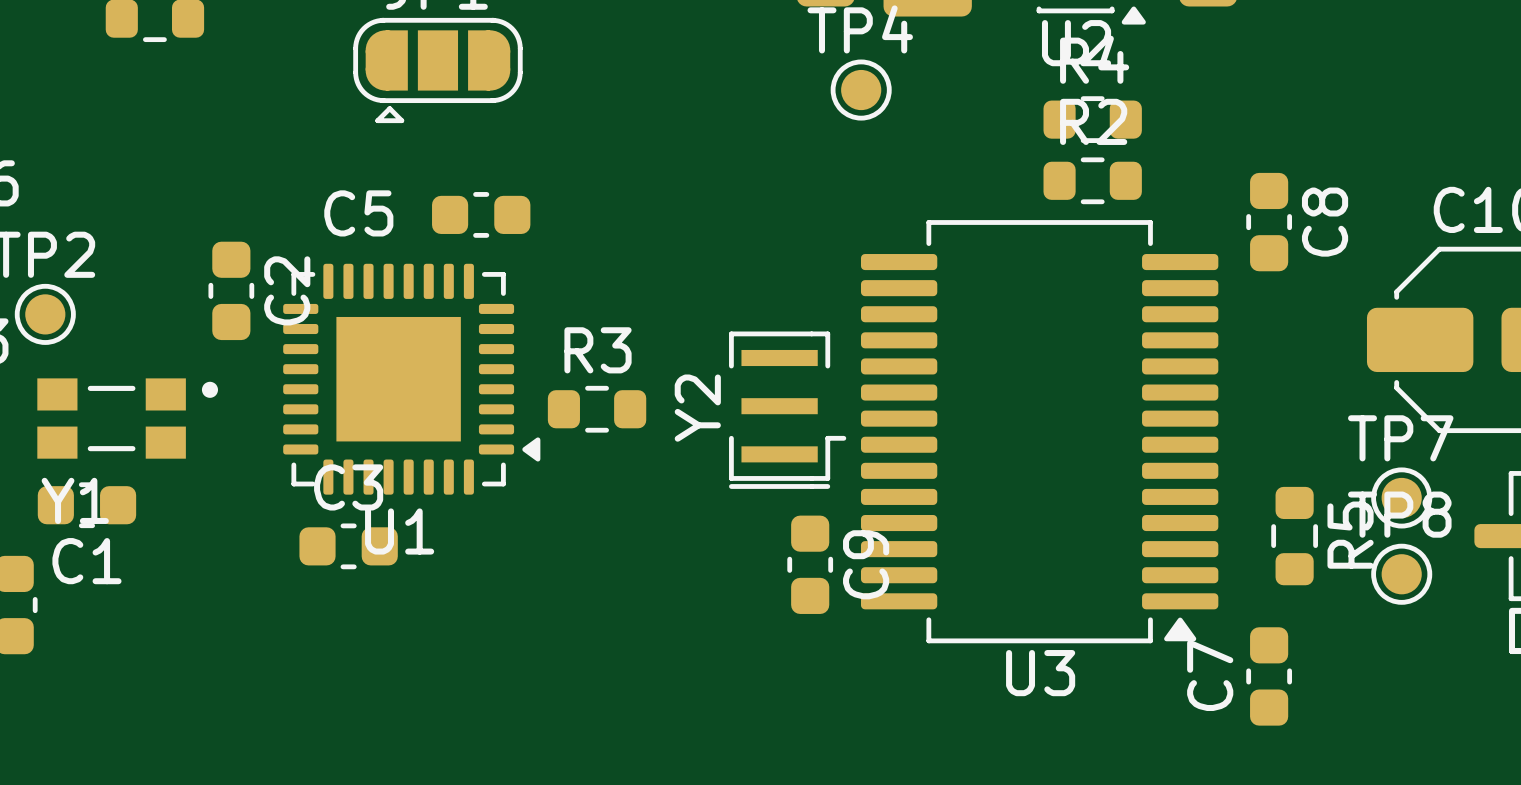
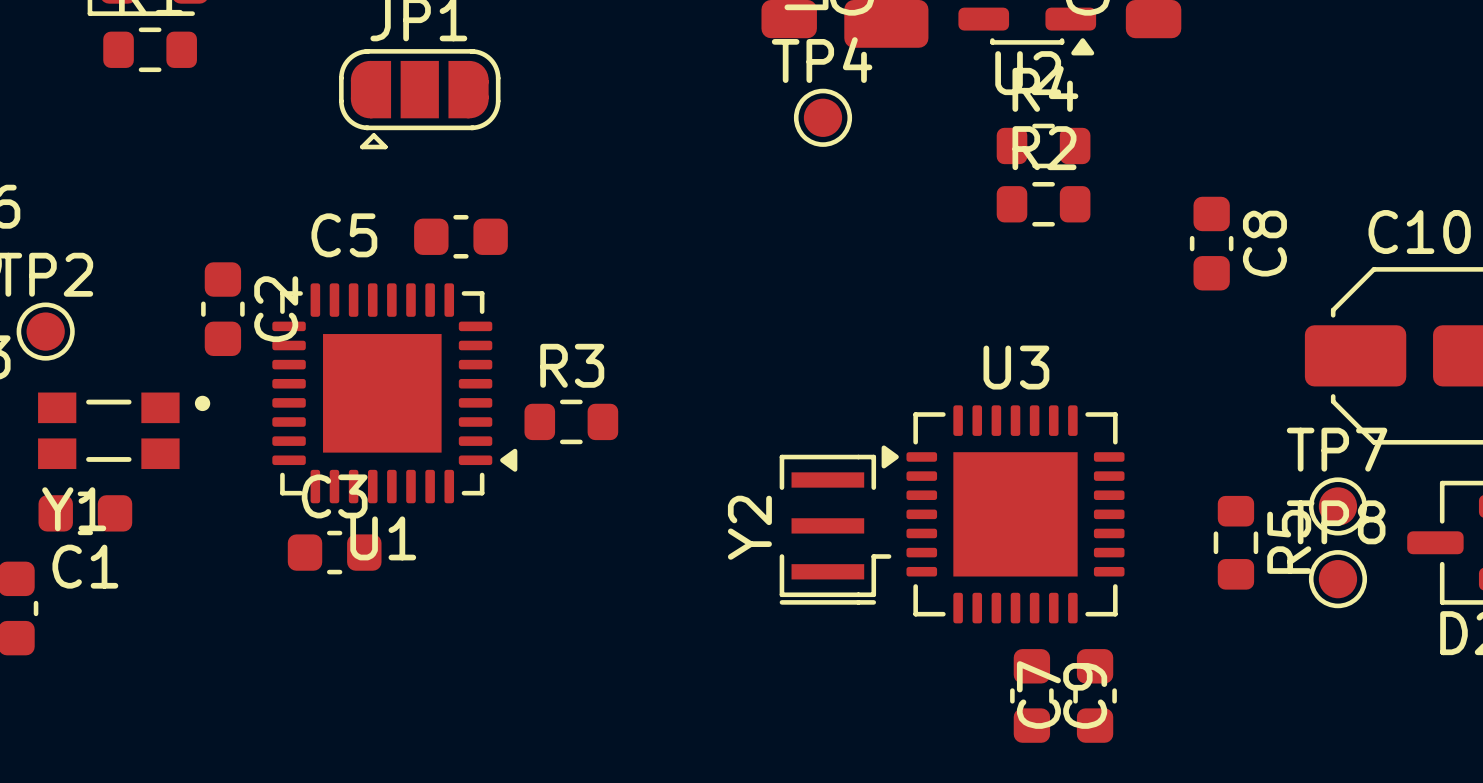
U3 footprint: [860, 220, 1219, 644] -> [881, 405, 1125, 624]
Y2 position: (787, 410) -> (835, 529)
C9 position: (810, 564) -> (1031, 695)
U3 name position: U3 (1040, 673) -> U3 (1016, 367)
C7 position: (1269, 676) -> (1095, 695)

